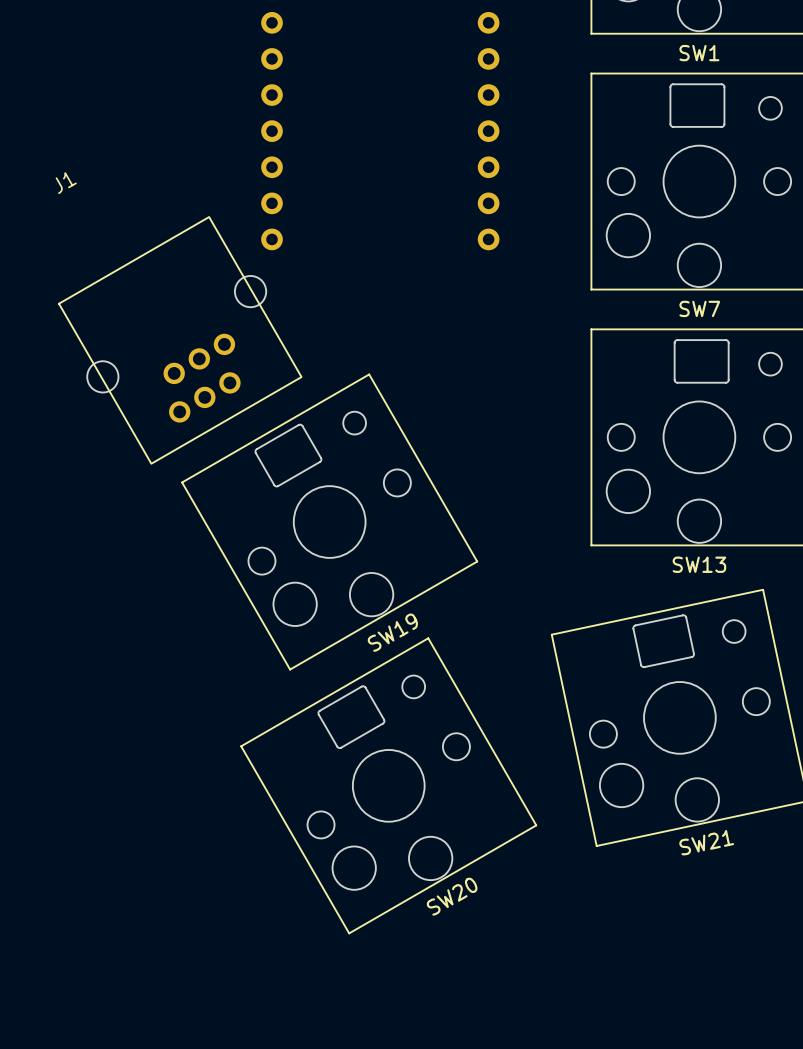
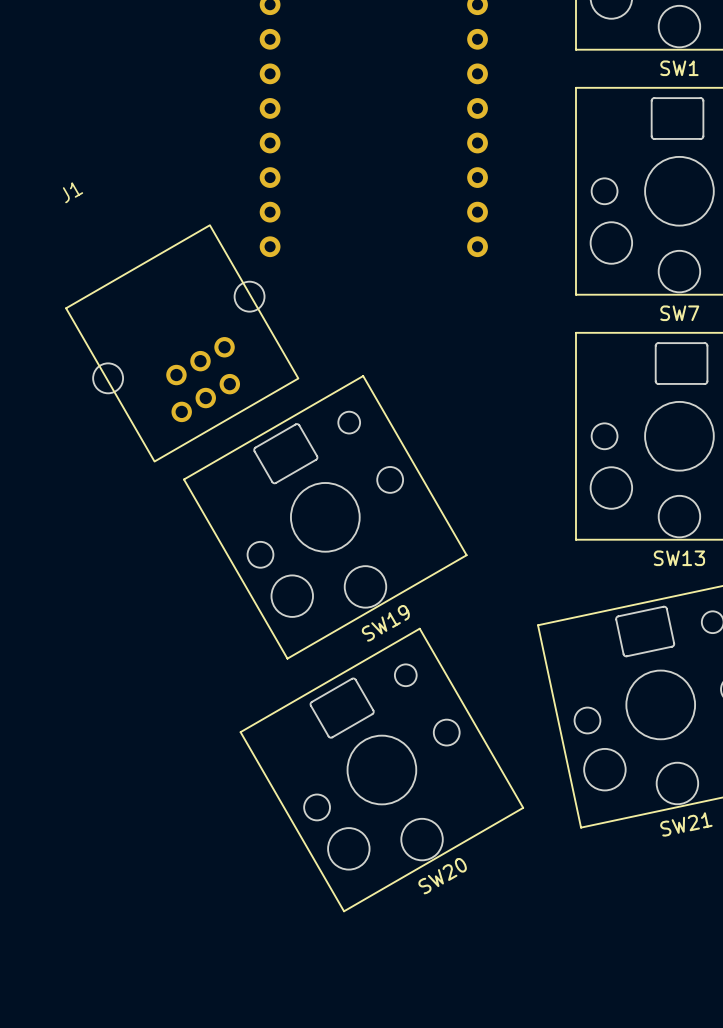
part footprint: [317, 685, 386, 749] -> [309, 677, 375, 739]

